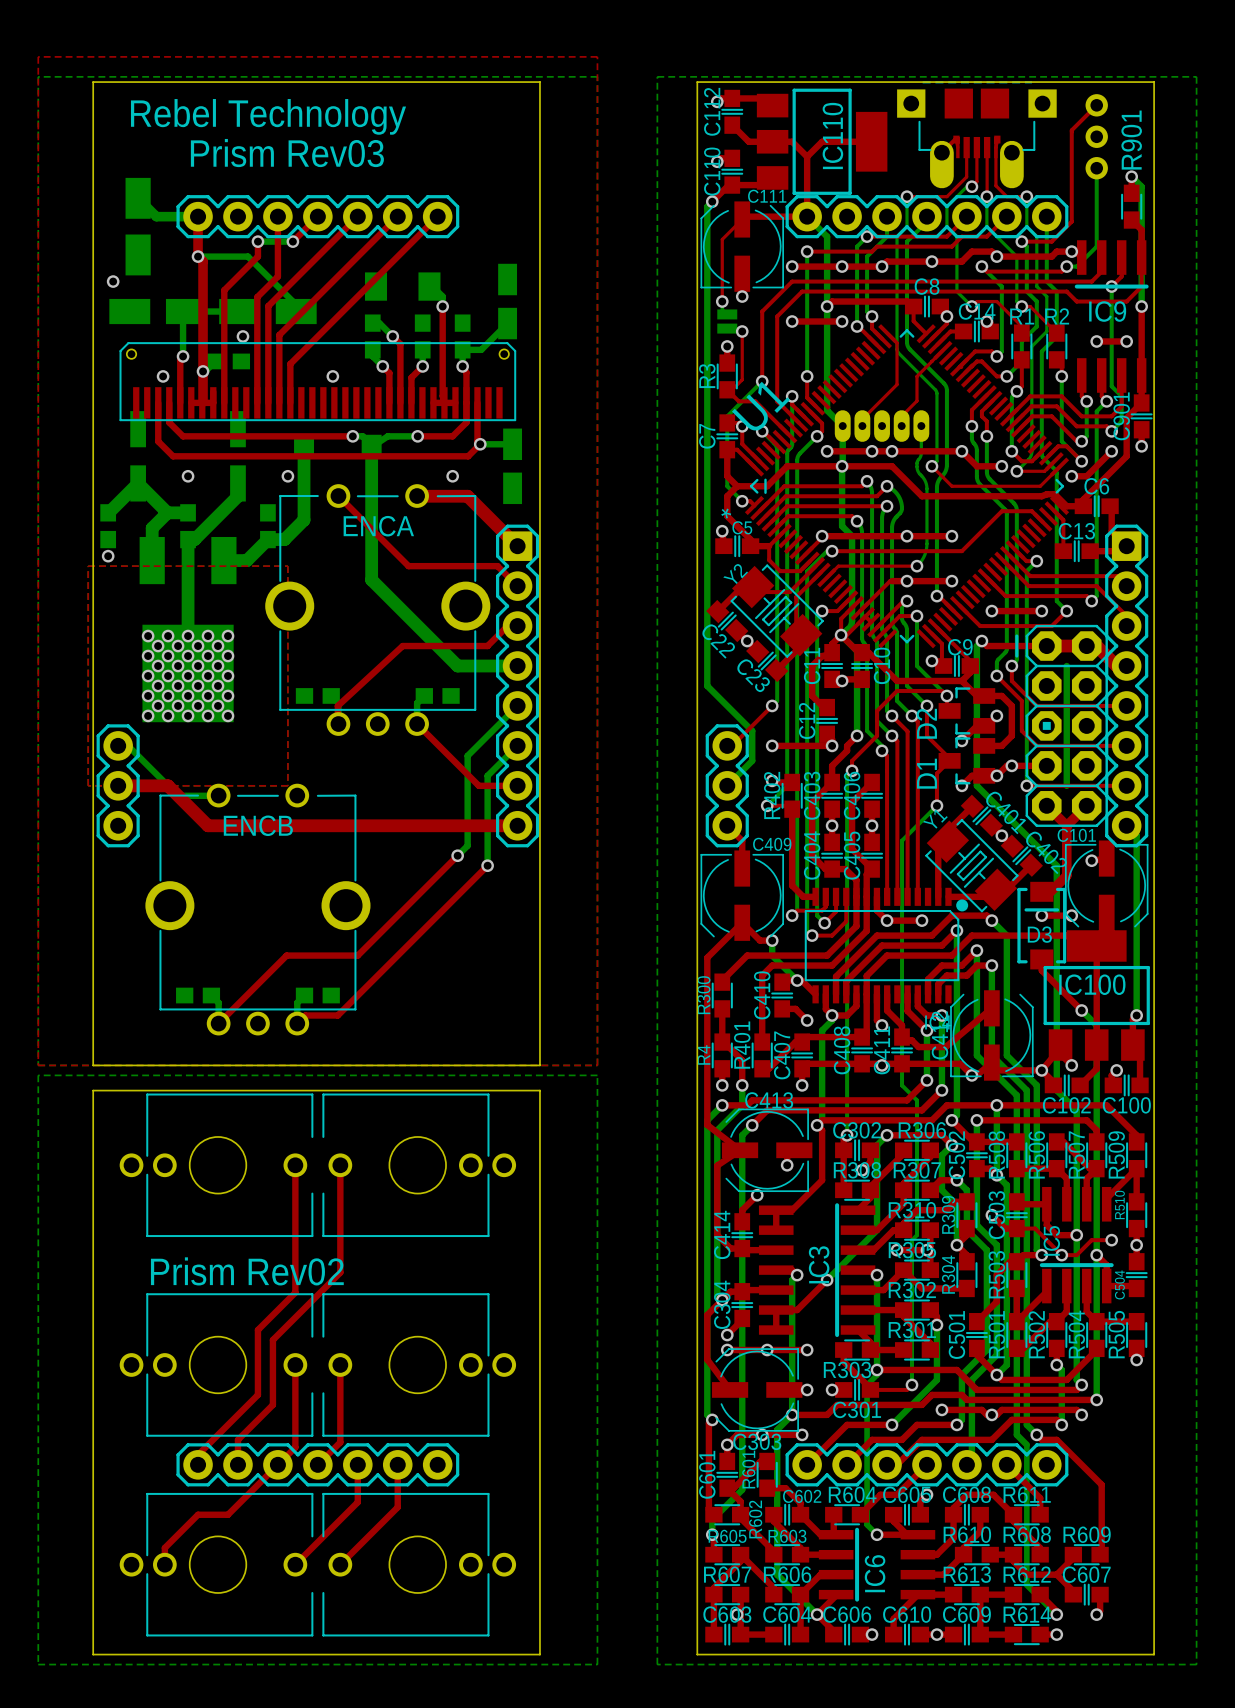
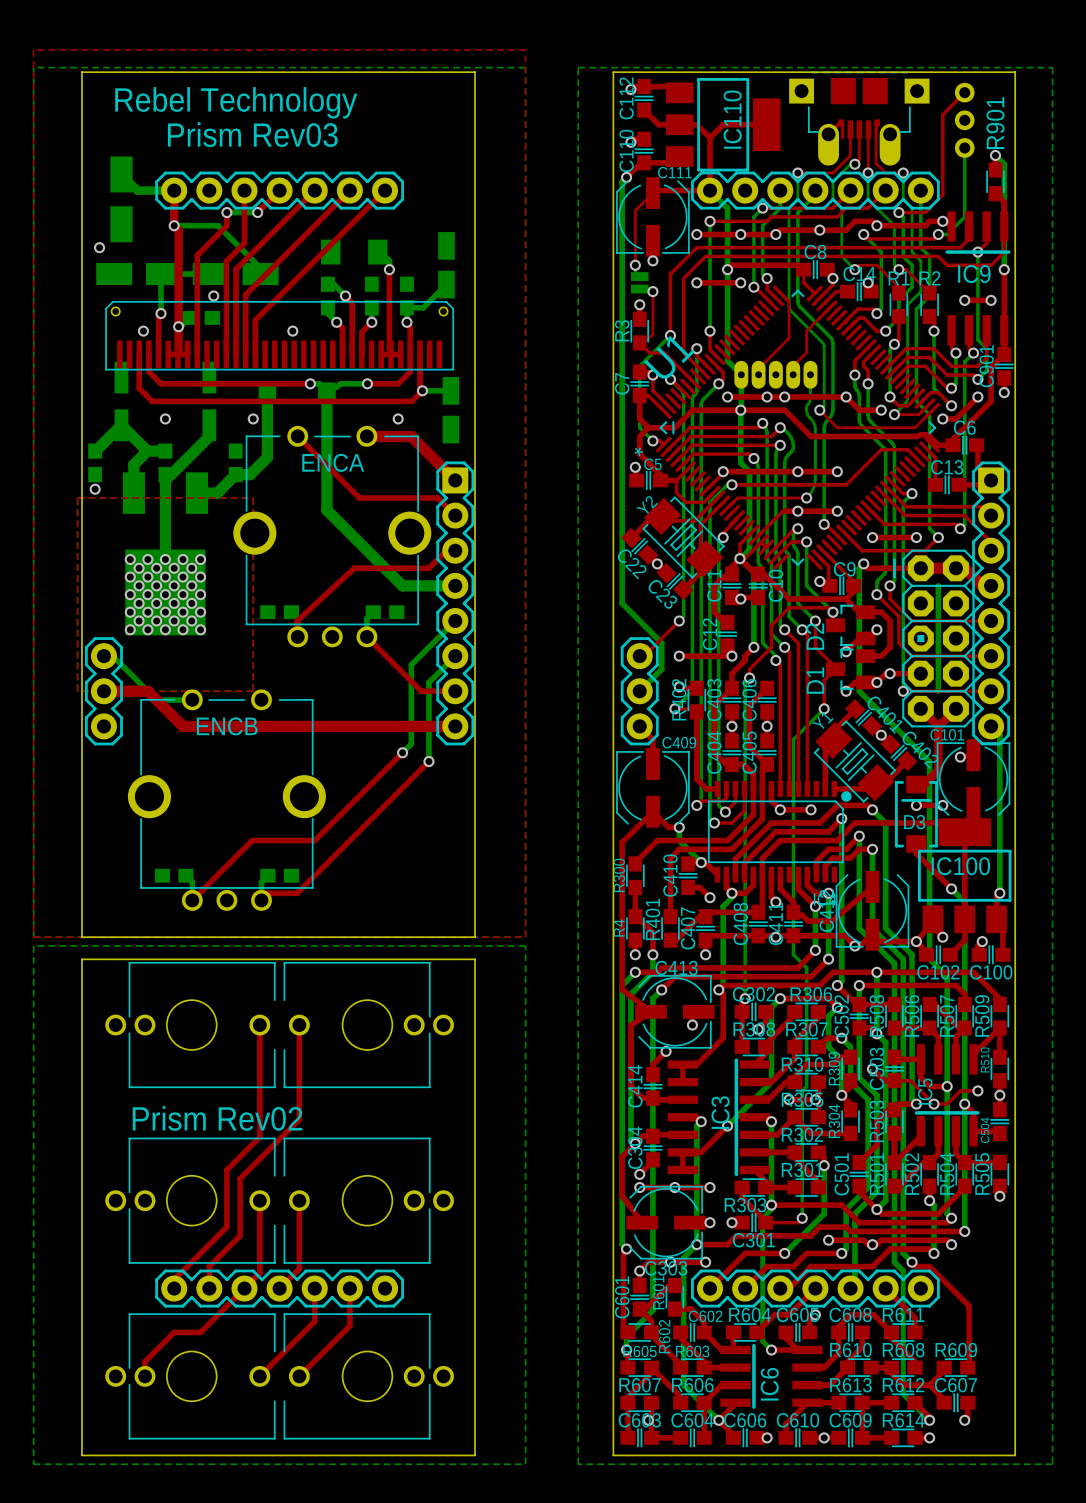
top track: none -> (736, 517) (723, 533)
top track: (848, 599) (837, 611) (822, 611) -> none

